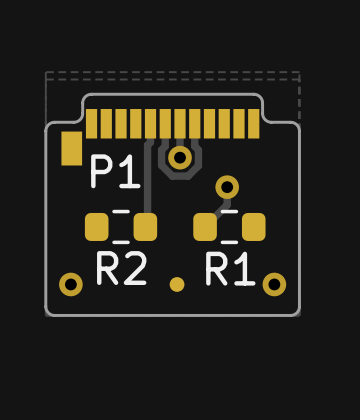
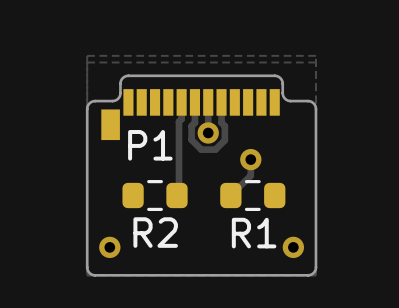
part: (177, 284) -> none

